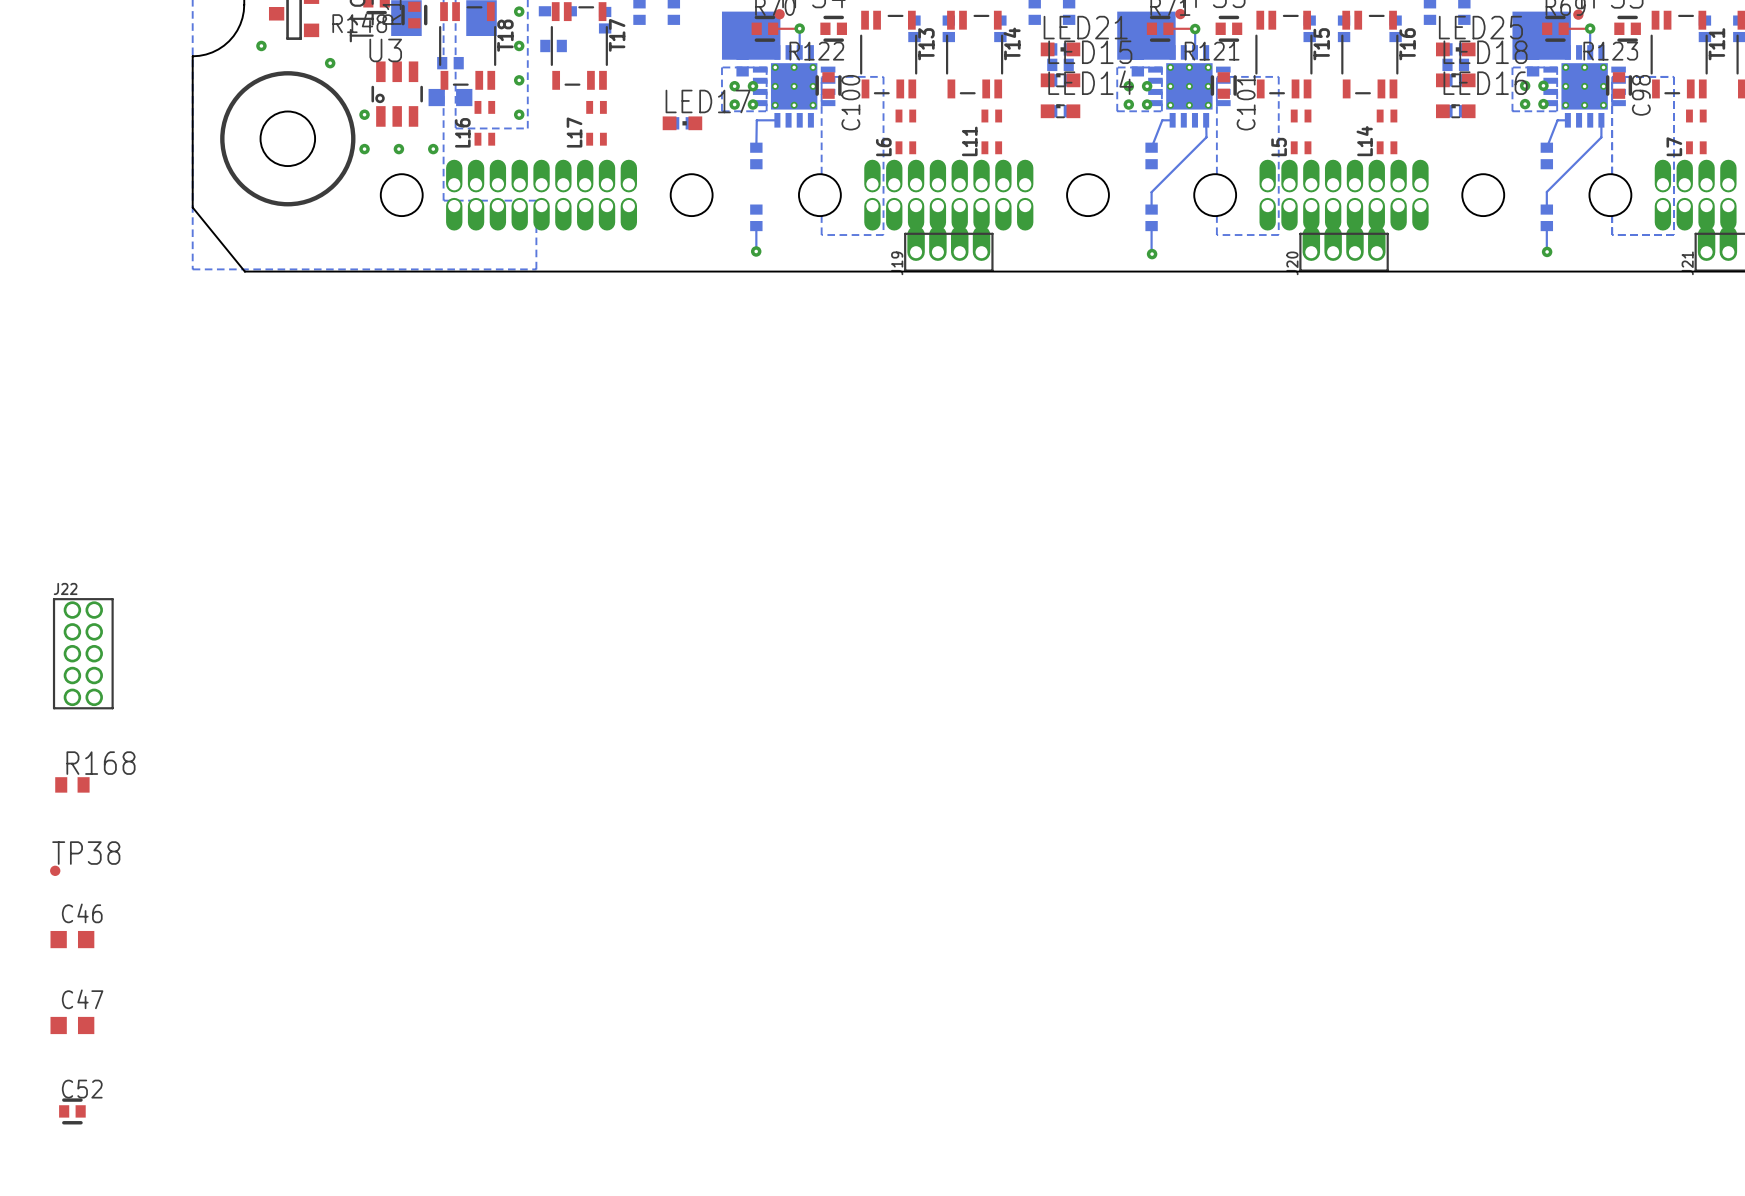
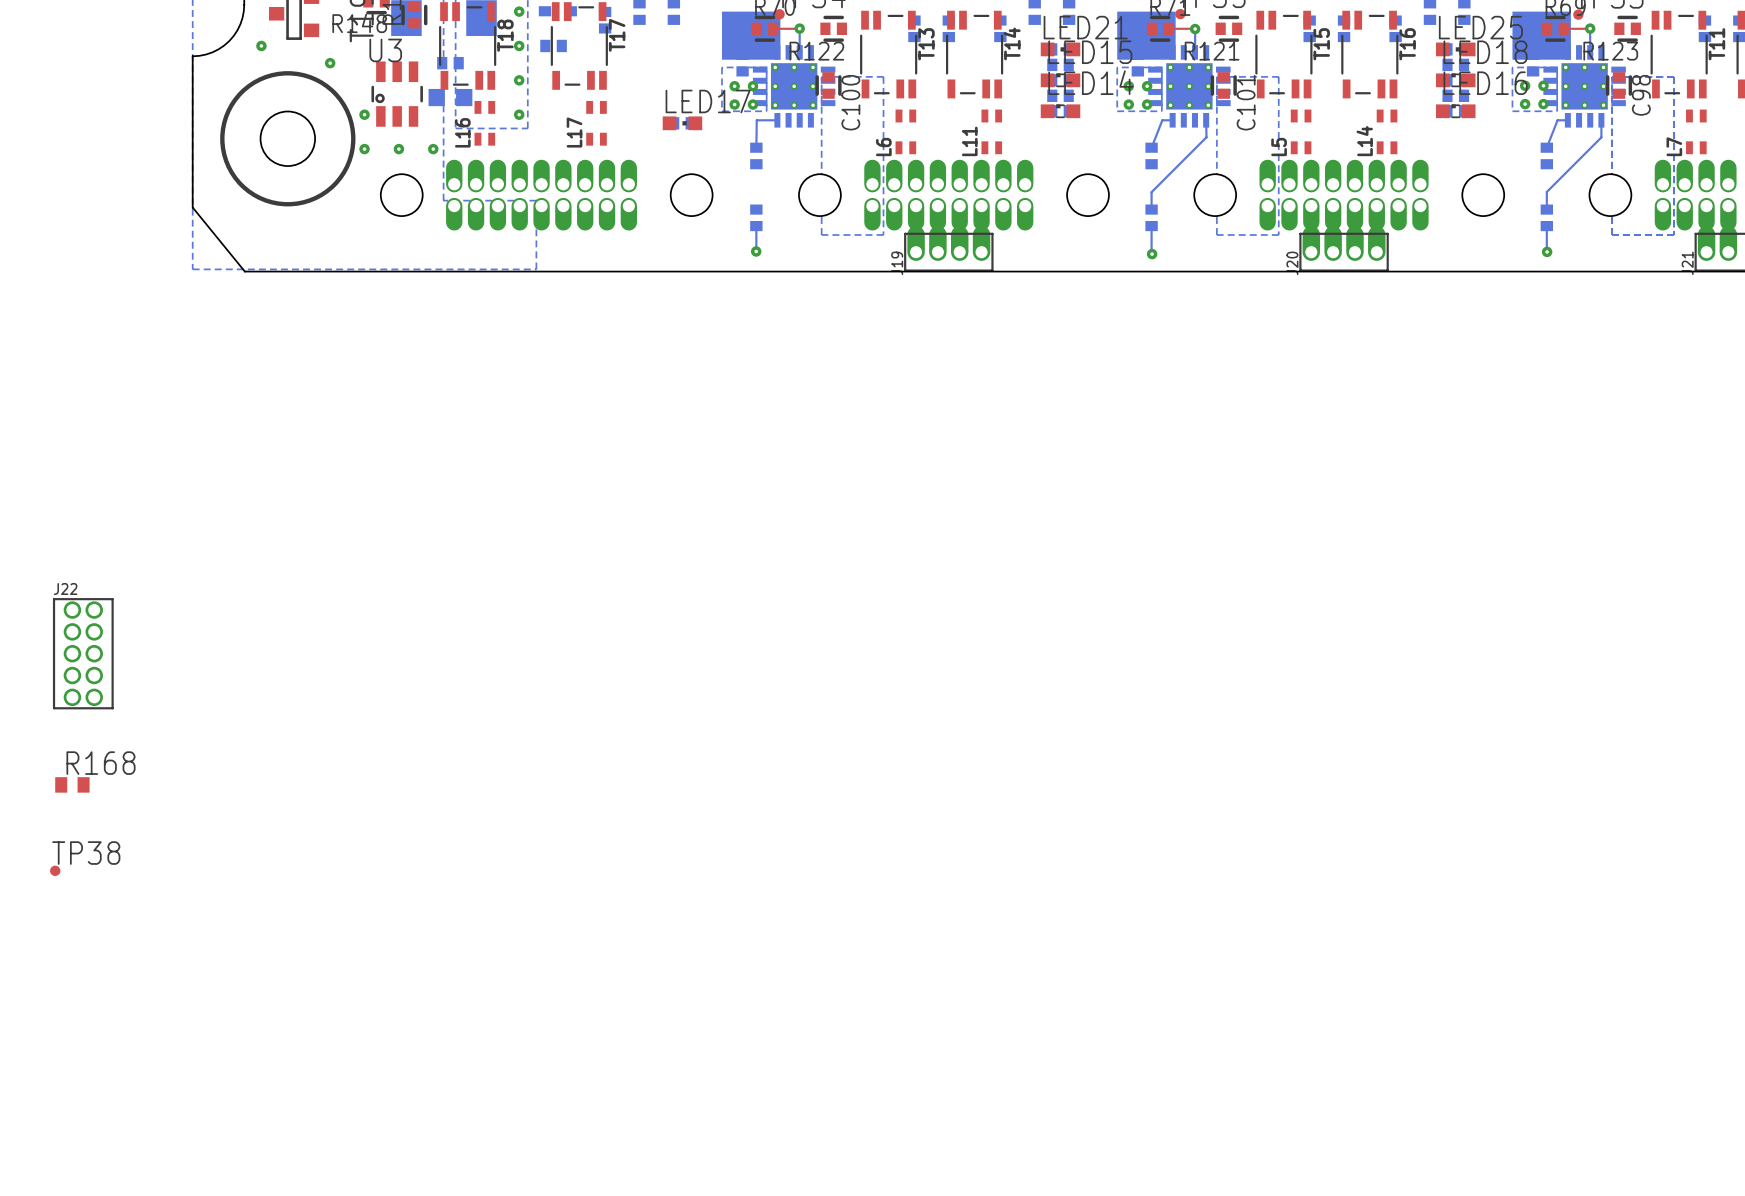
part: none -> (1060, 95)
part: none -> (1455, 95)
C46: (72, 939) -> none
C47: (72, 1025) -> none
C52: (72, 1111) -> none

